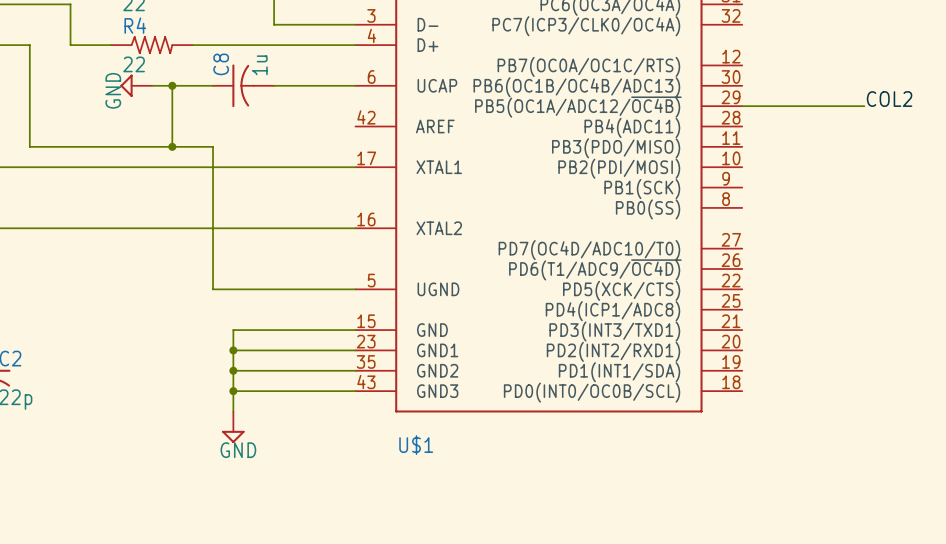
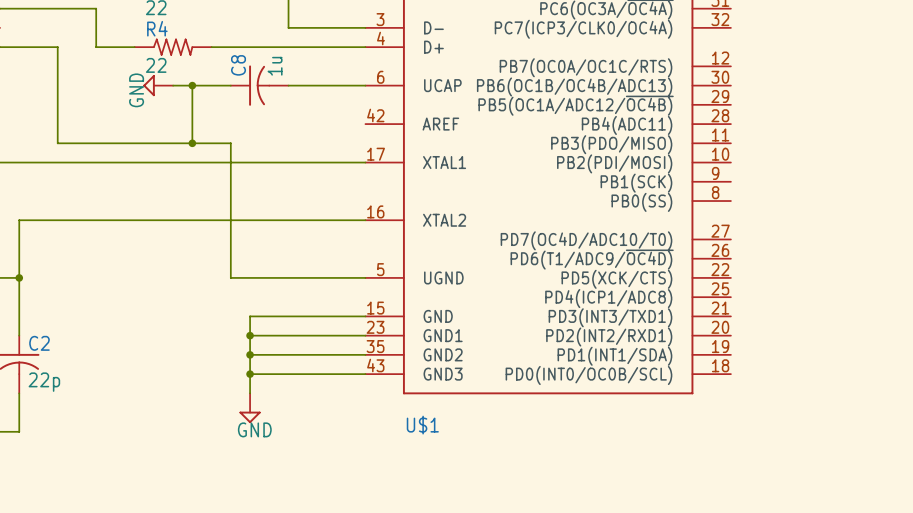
label: COL2 (889, 99) -> none
wire: (742, 106) (864, 106) -> none

